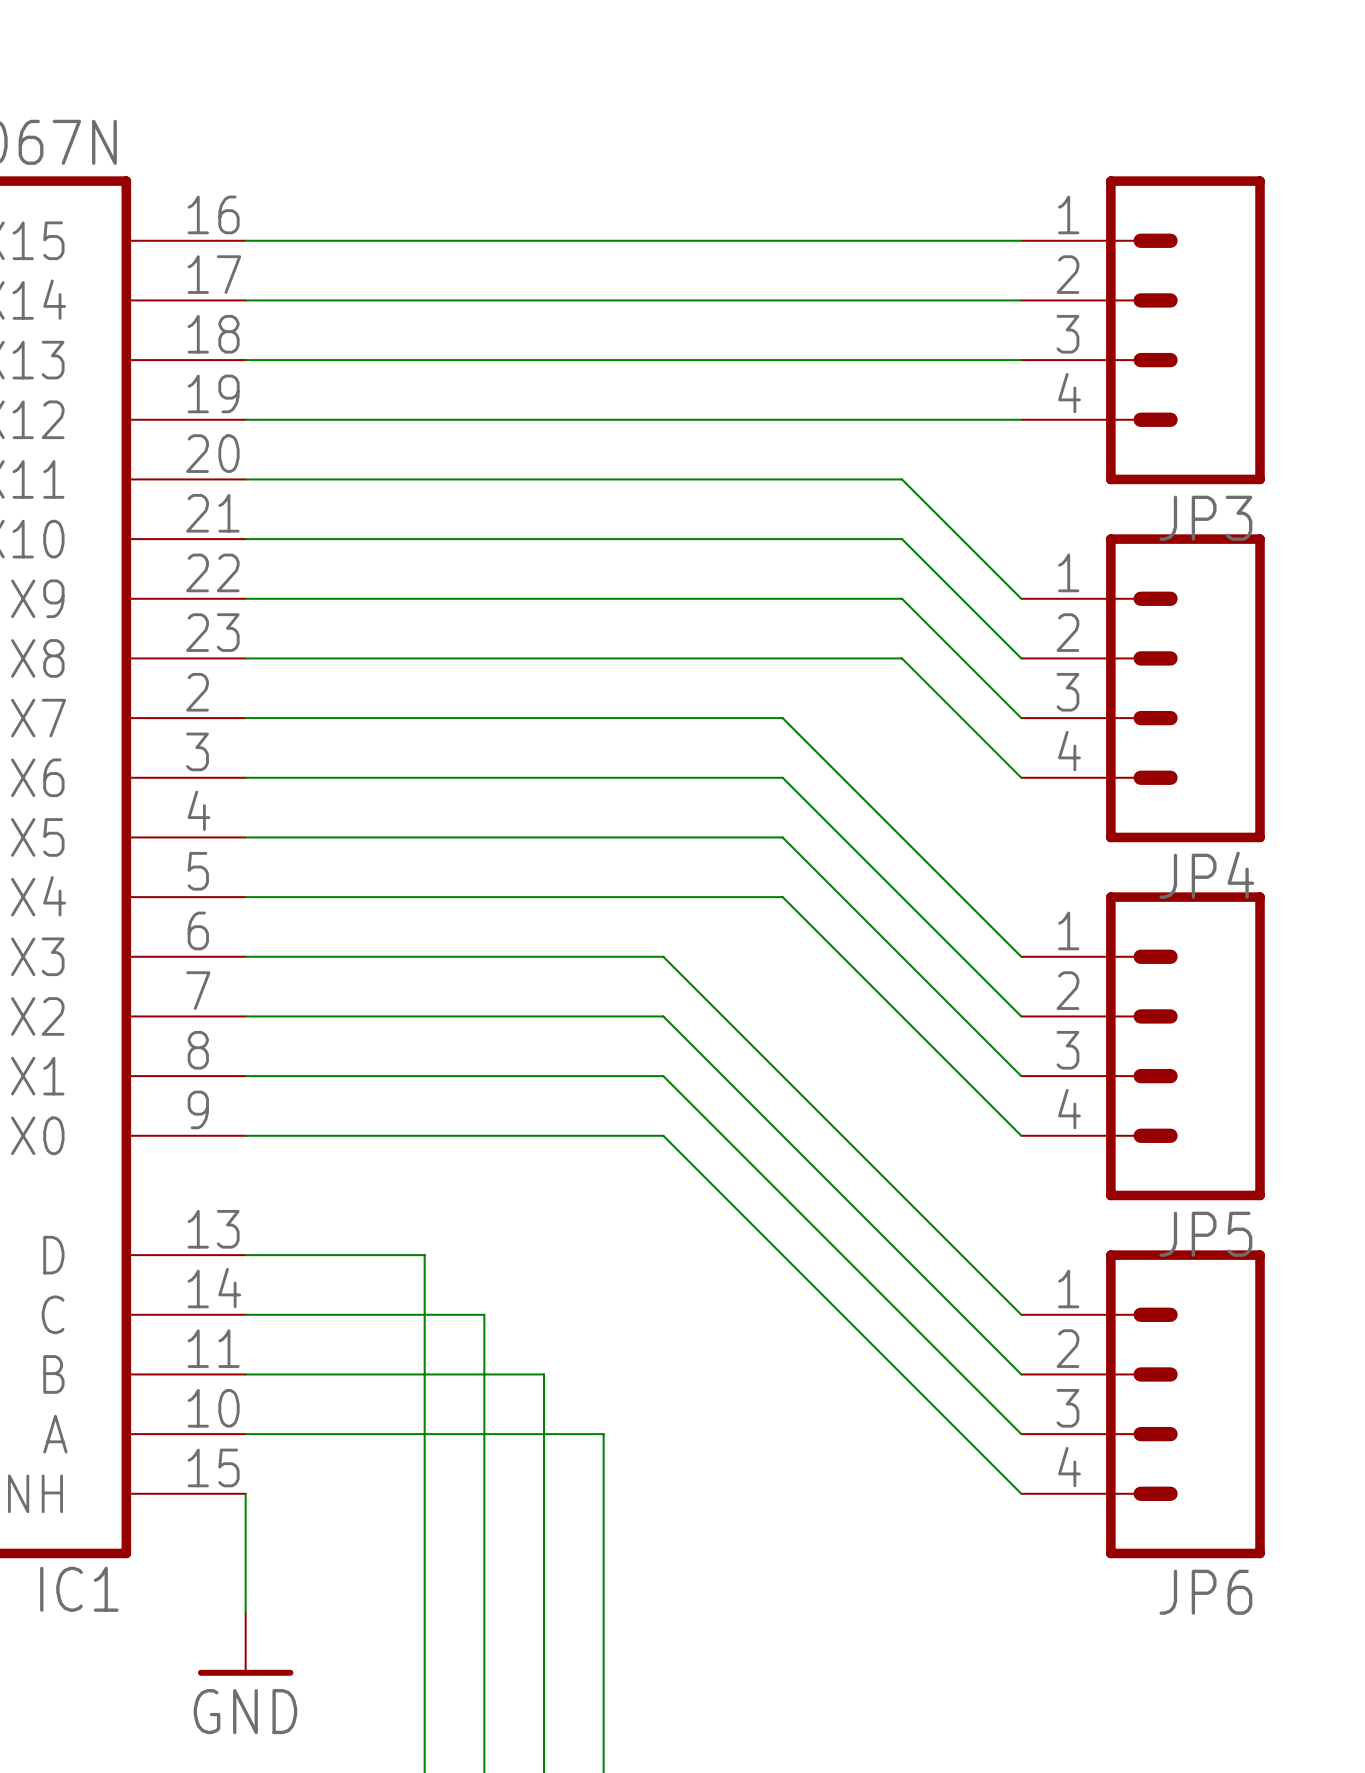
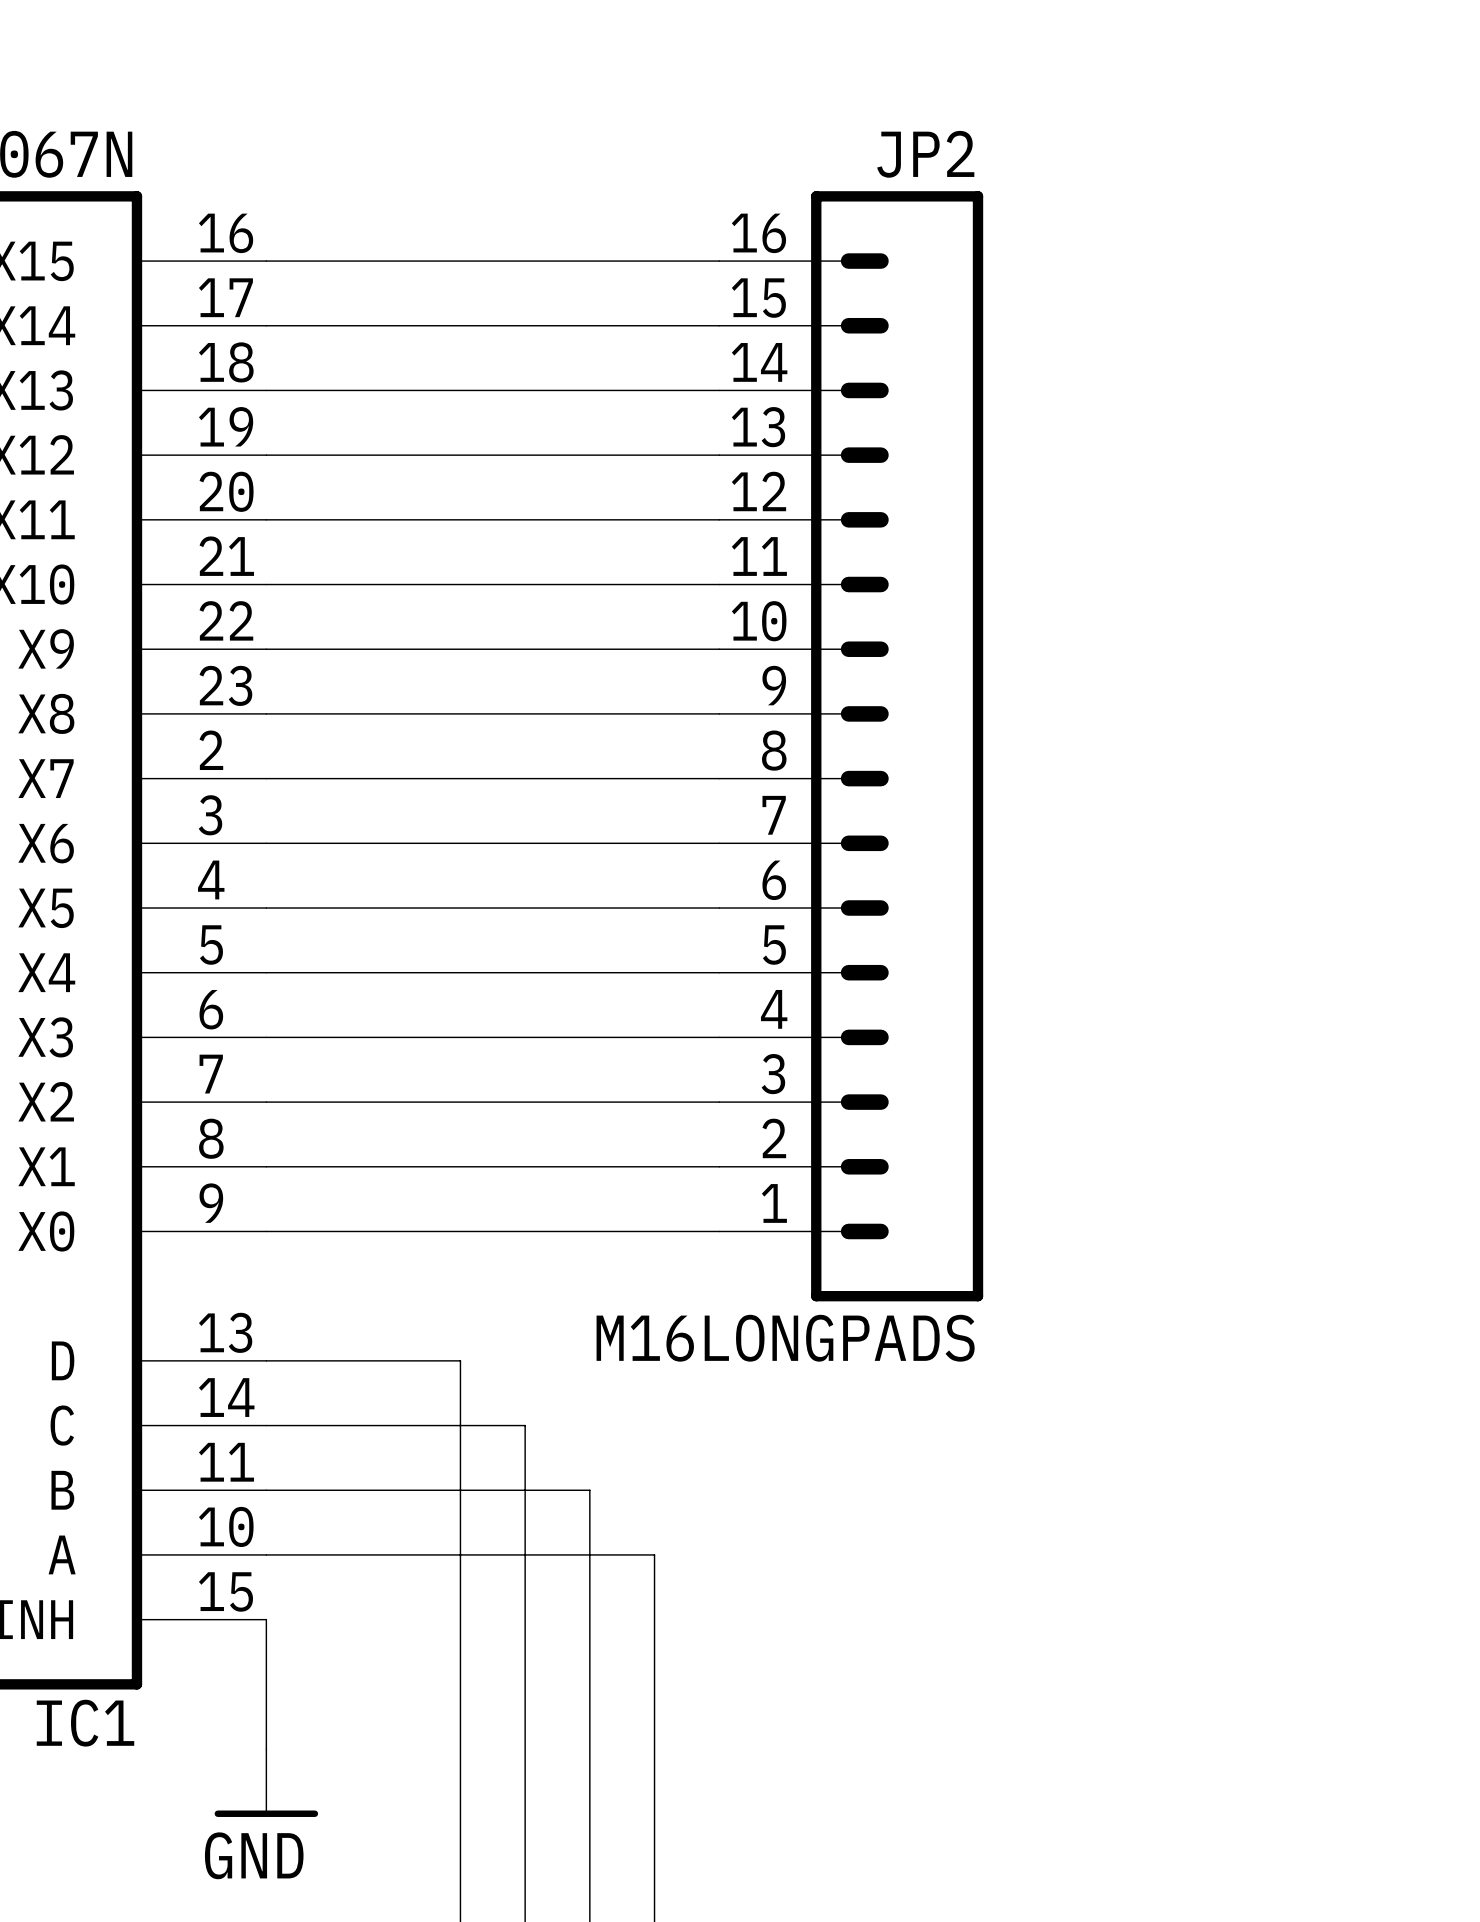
wire: (663, 240) (1021, 240) -> none
wire: (663, 300) (1021, 300) -> none
JP3: (1143, 330) -> none
wire: (663, 360) (1021, 360) -> none
wire: (663, 419) (1021, 419) -> none
wire: (663, 479) (902, 479) (1021, 598) -> none
wire: (663, 539) (902, 539) (1021, 658) -> none
wire: (663, 598) (902, 598) (1021, 718) -> none
wire: (663, 658) (902, 658) (1021, 777) -> none
JP2: none -> M16LONGPADS (851, 746)
JP4: (1143, 688) -> none
wire: (663, 718) (782, 718) (1021, 956) -> none
wire: (663, 777) (782, 777) (1021, 1016) -> none
wire: (663, 837) (782, 837) (1021, 1076) -> none
wire: (663, 897) (782, 897) (1021, 1135) -> none
wire: (663, 956) (1021, 1314) -> none
wire: (663, 1016) (1021, 1374) -> none
JP5: (1143, 1046) -> none
wire: (663, 1076) (1021, 1434) -> none
wire: (663, 1135) (1021, 1493) -> none
JP6: (1143, 1404) -> none

